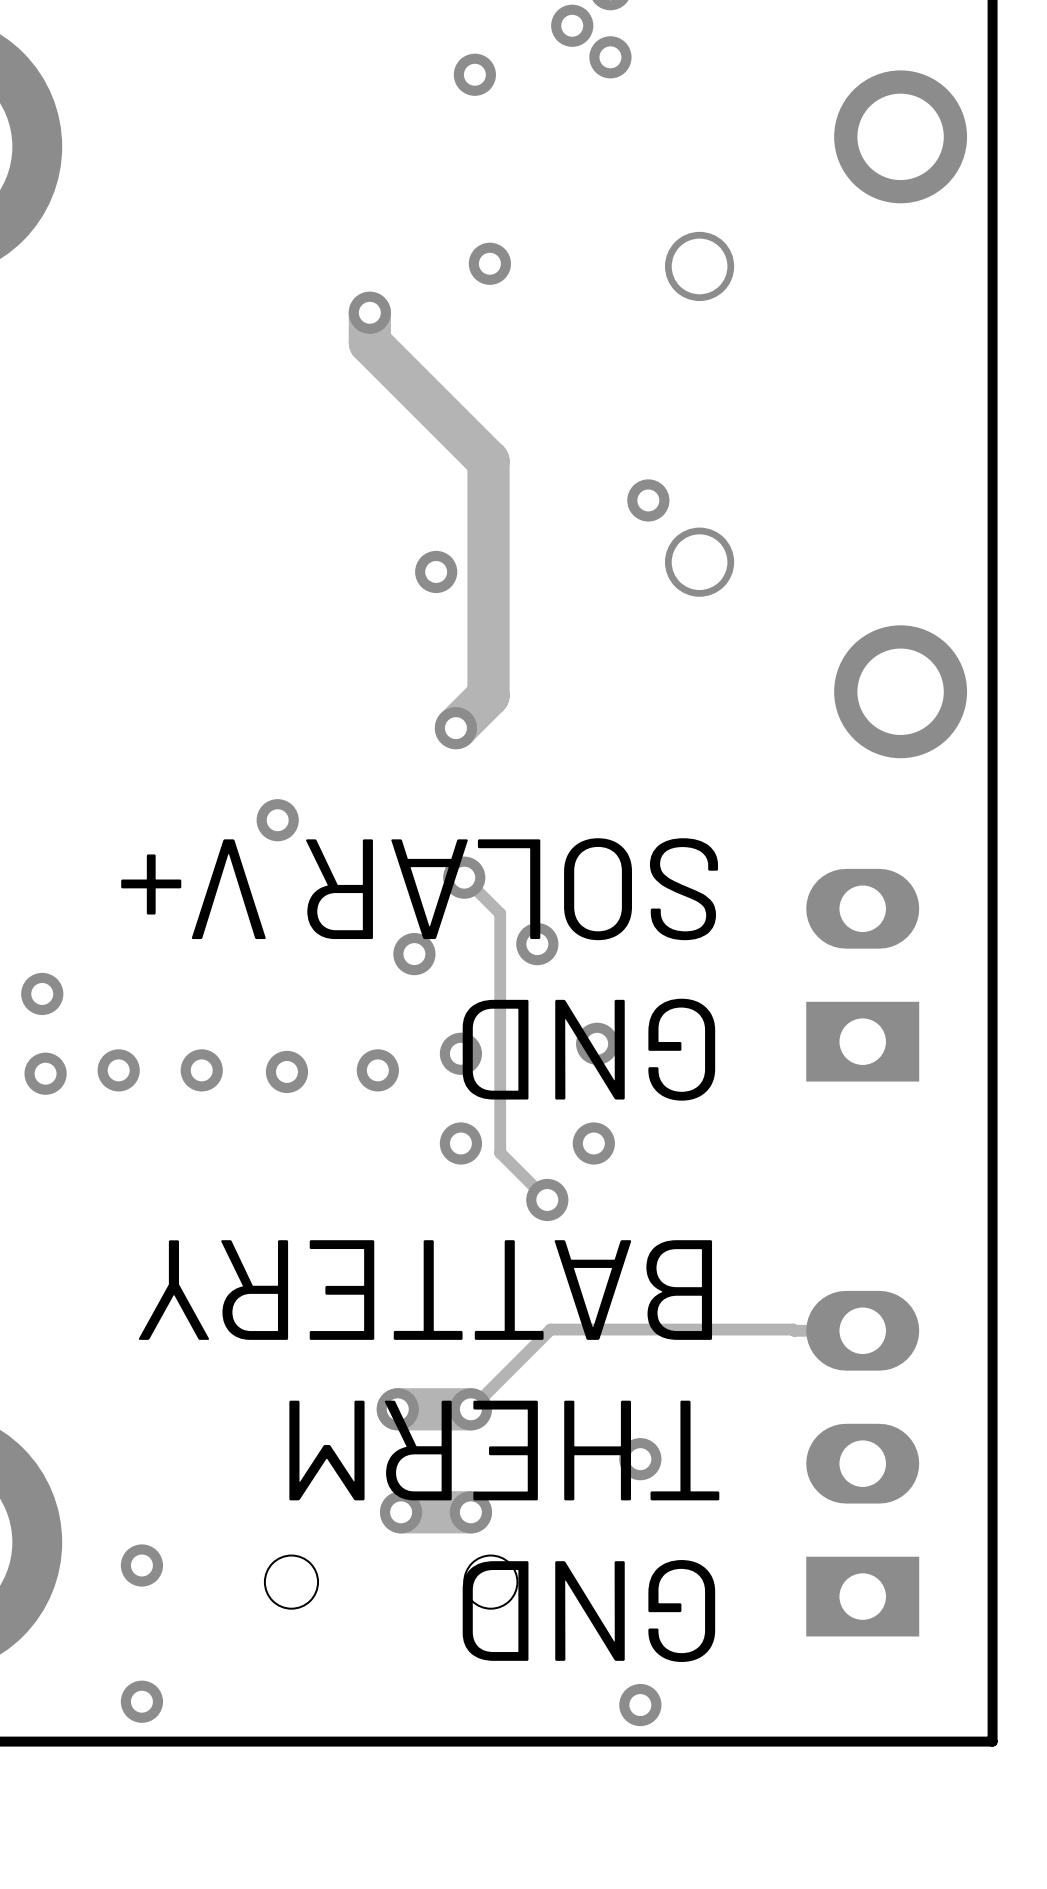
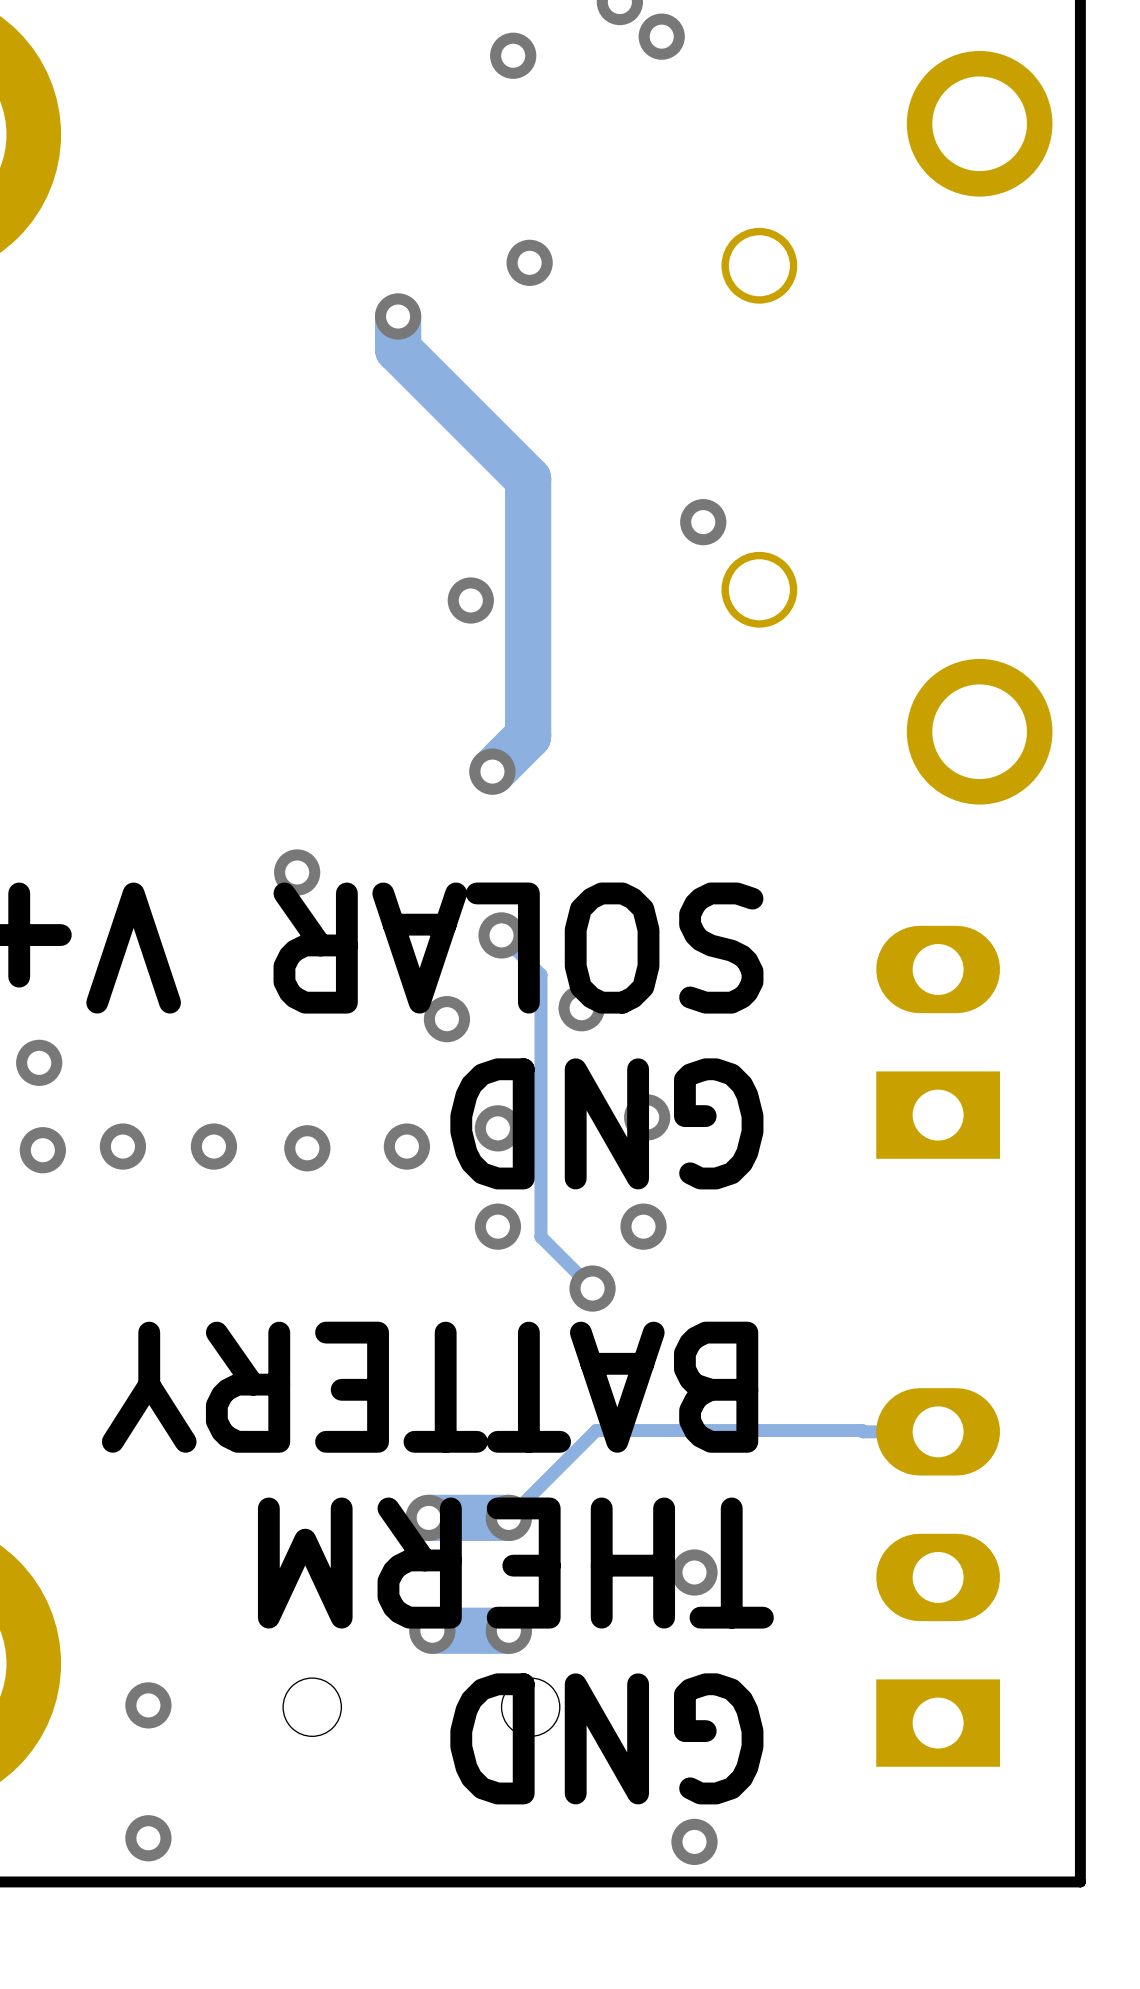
via position: (141, 1565) -> (148, 1705)

